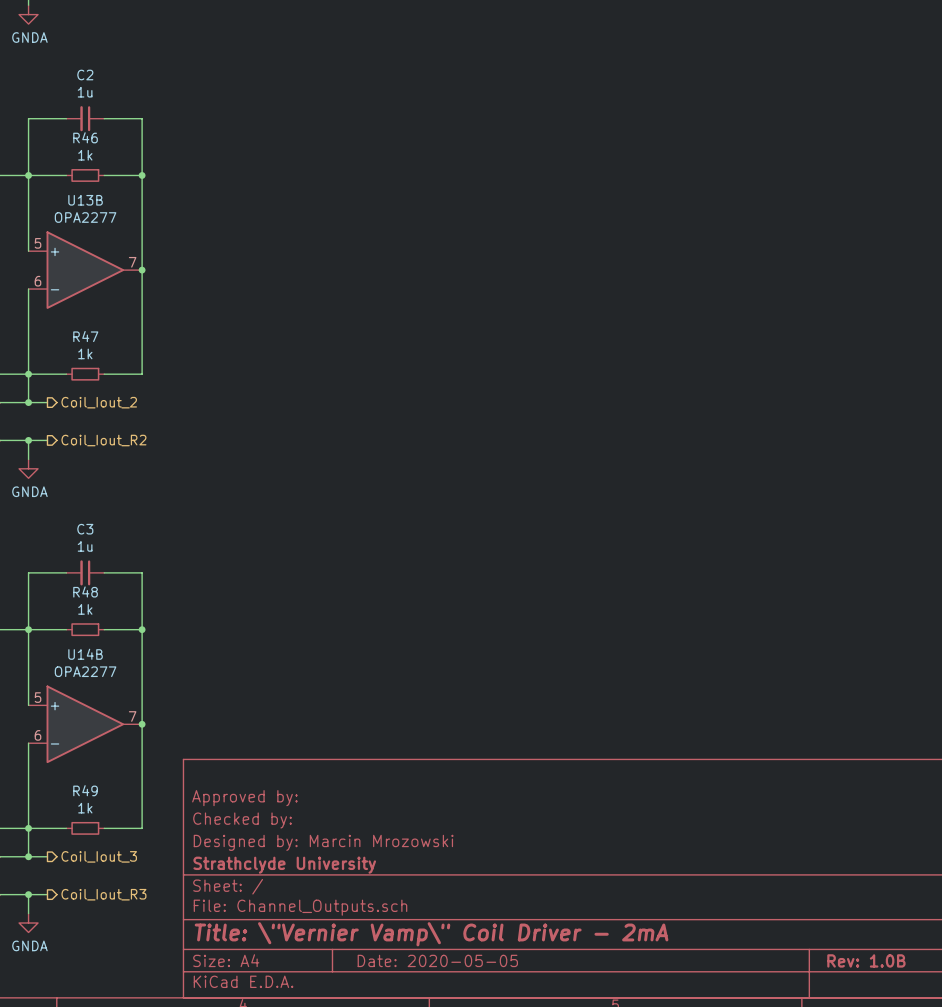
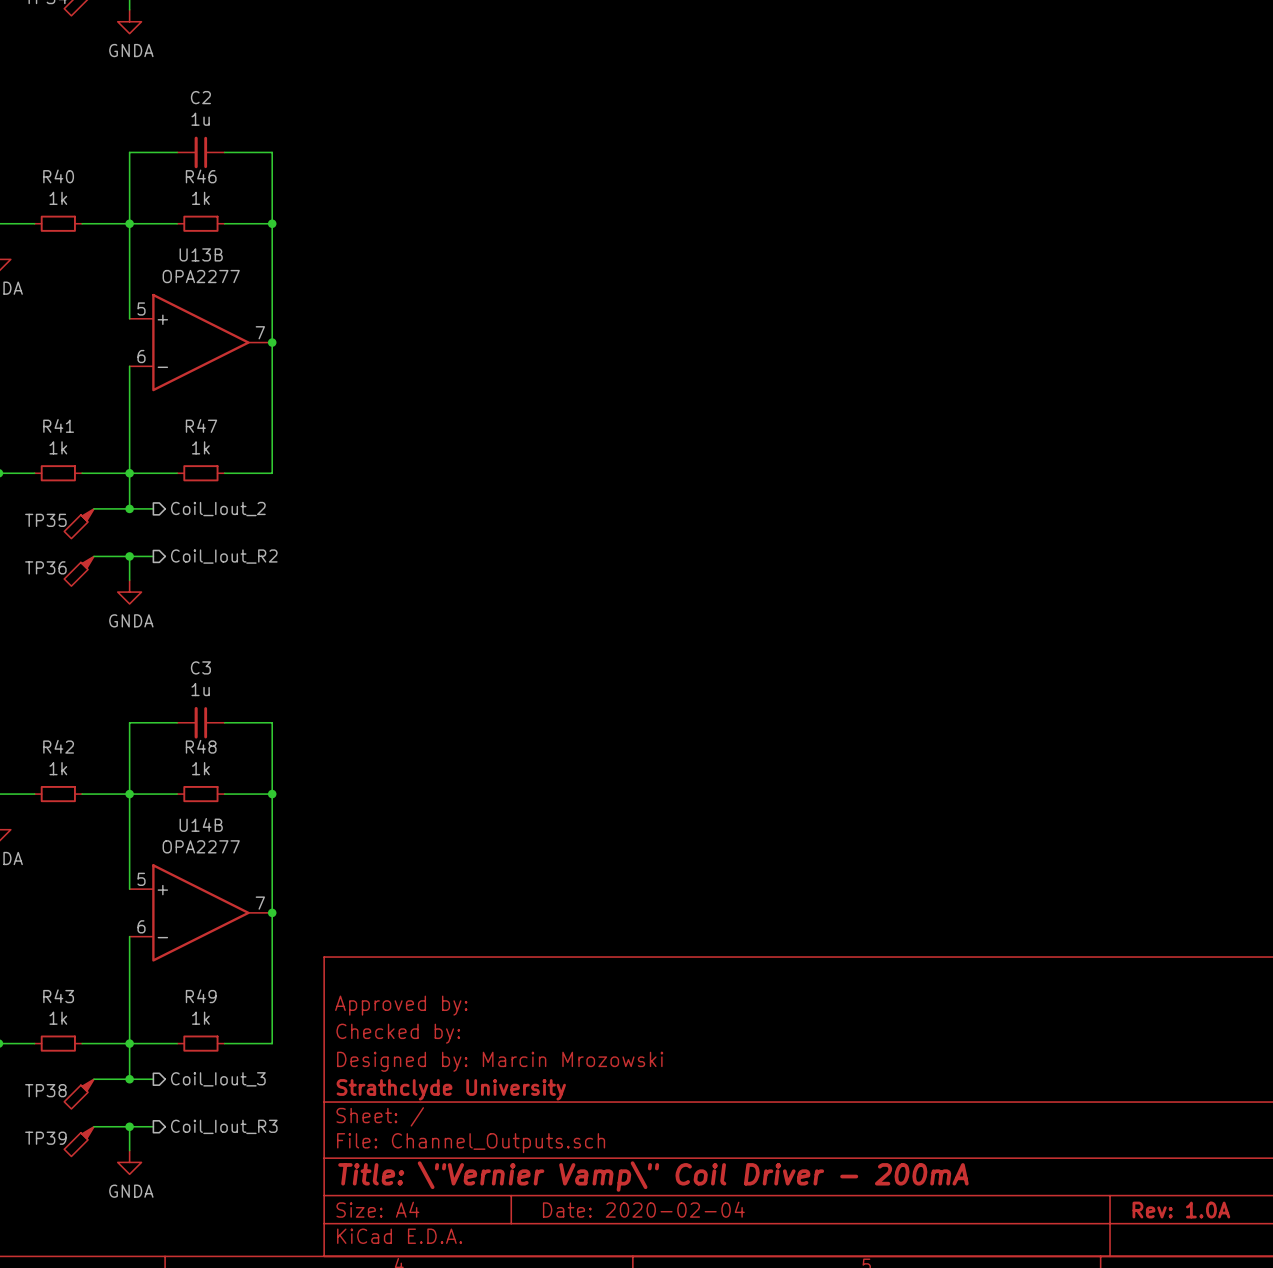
title block: Title: \"Vernier Vamp\" Coil Driver - 2mA (431, 934) -> Title: \"Vernier Vamp\" Coil Driver - 200mA (653, 1176)
title block: Date: 2020-05-05 (437, 960) -> Date: 2020-02-04 (643, 1209)
title block: Rev: 1.0B (866, 960) -> Rev: 1.0A (1181, 1210)

